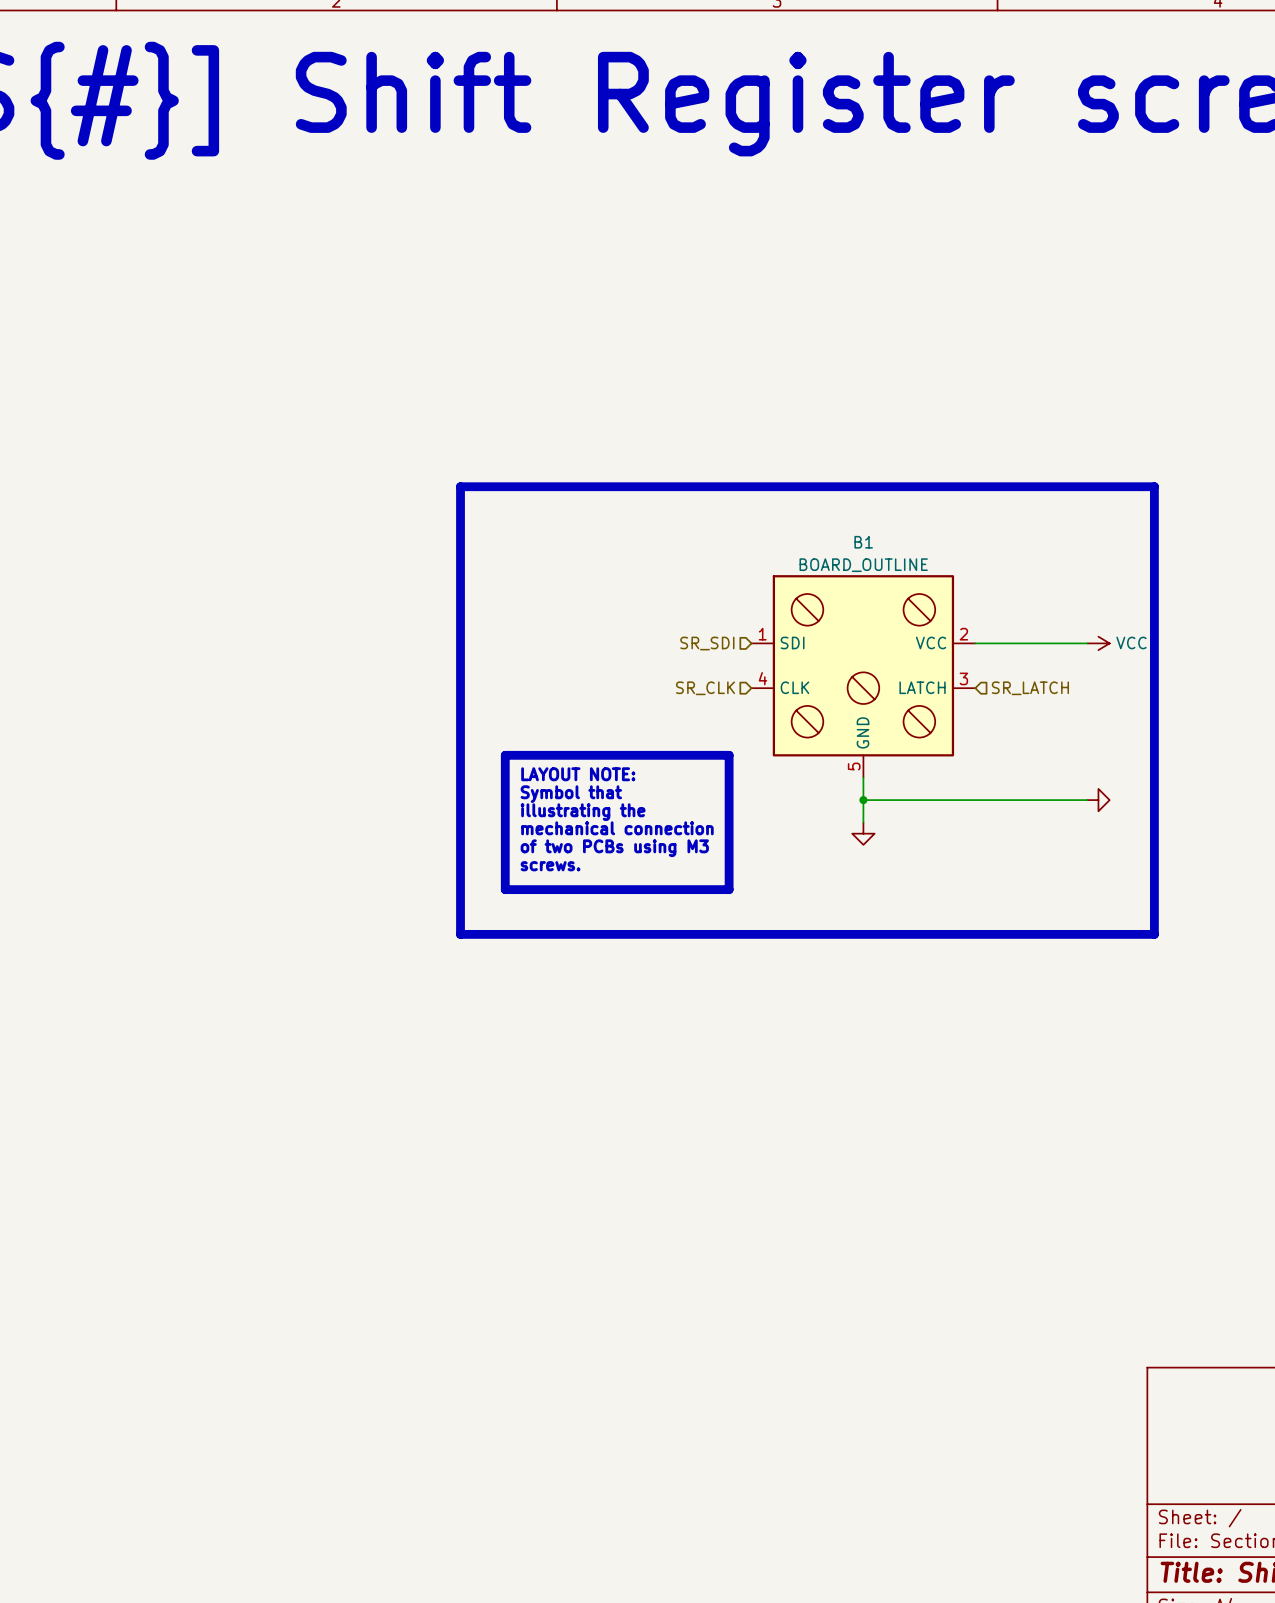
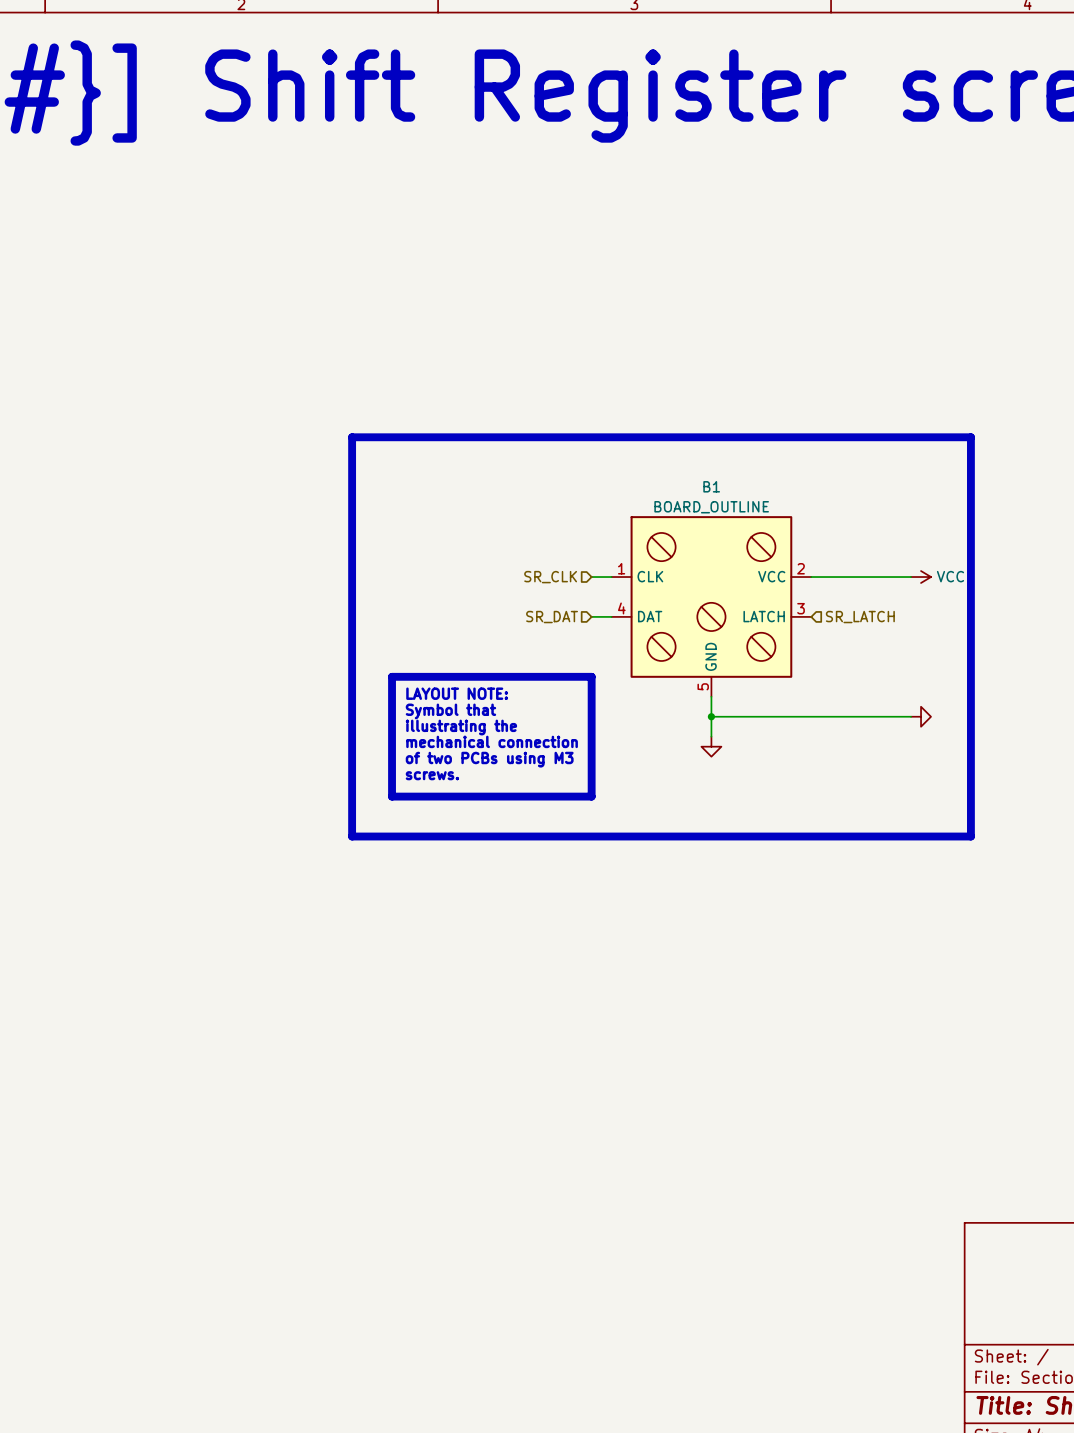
B1 pin name: SDI (792, 642) -> CLK (650, 576)
hierarchical label: SR_SDI (707, 643) -> none
wire: none -> (591, 577) (611, 577)
B1 pin name: CLK (794, 687) -> DAT (650, 616)
hierarchical label: none -> SR_DAT (552, 617)
hierarchical label position: SR_CLK (705, 688) -> SR_CLK (550, 577)
wire: none -> (591, 616) (611, 616)

